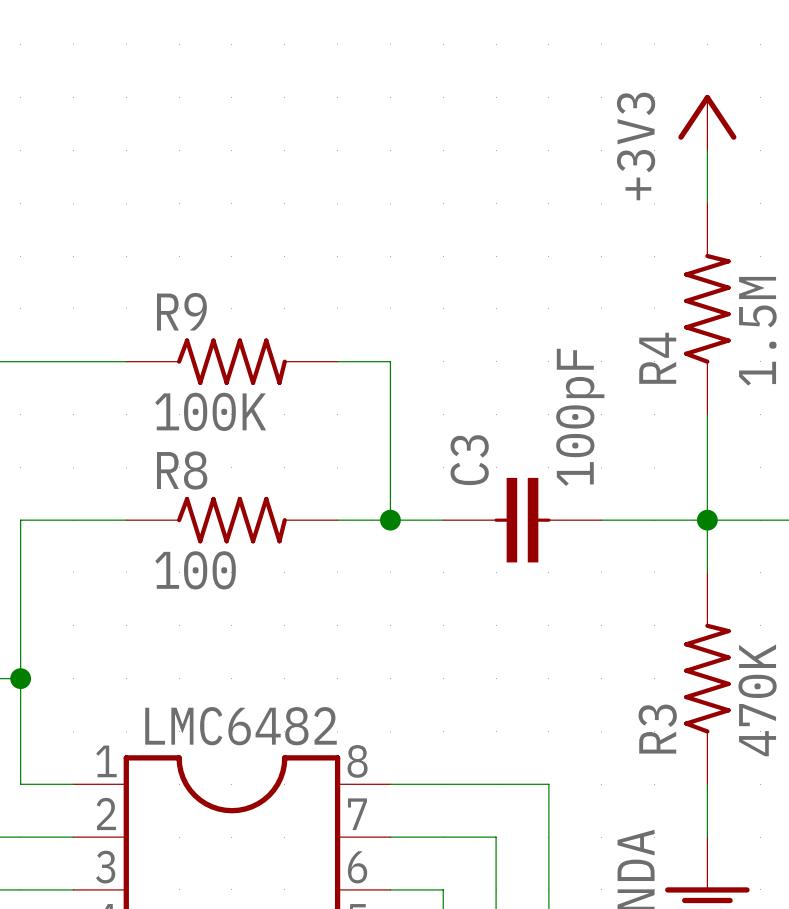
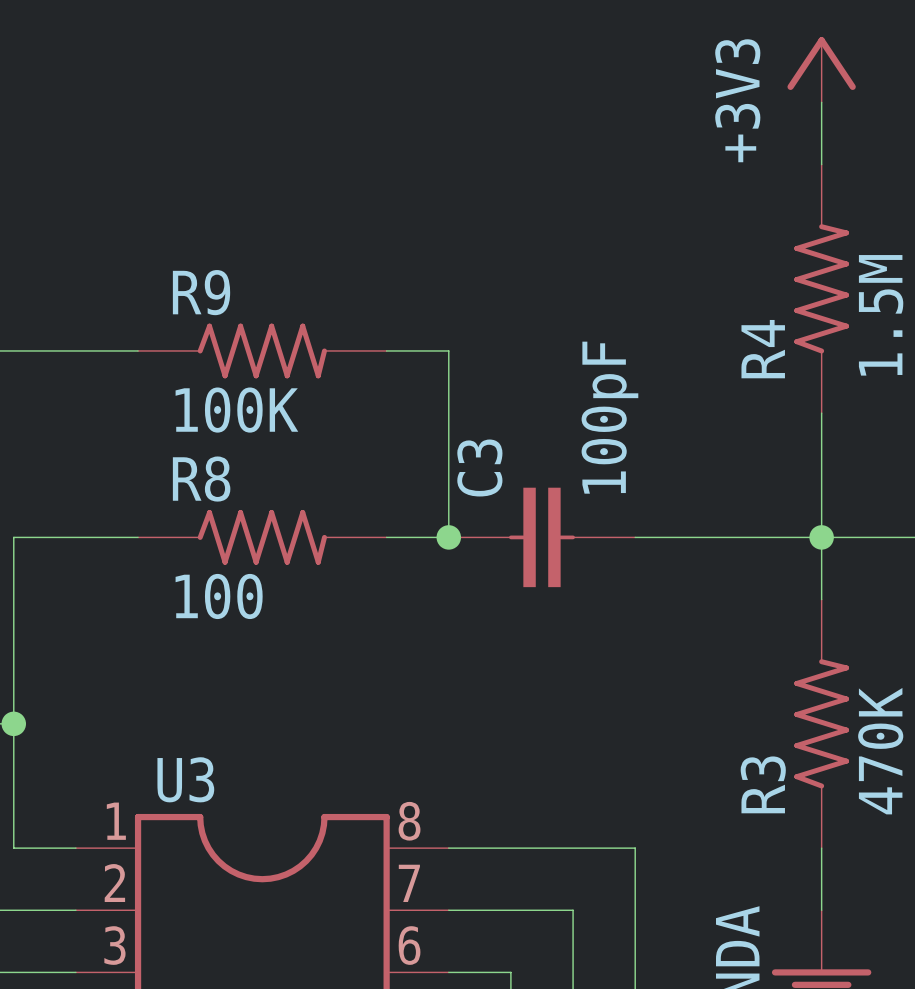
C3 position: (522, 520) -> (541, 537)
LMC6482 name: LMC6482 (240, 726) -> U3 (185, 779)

